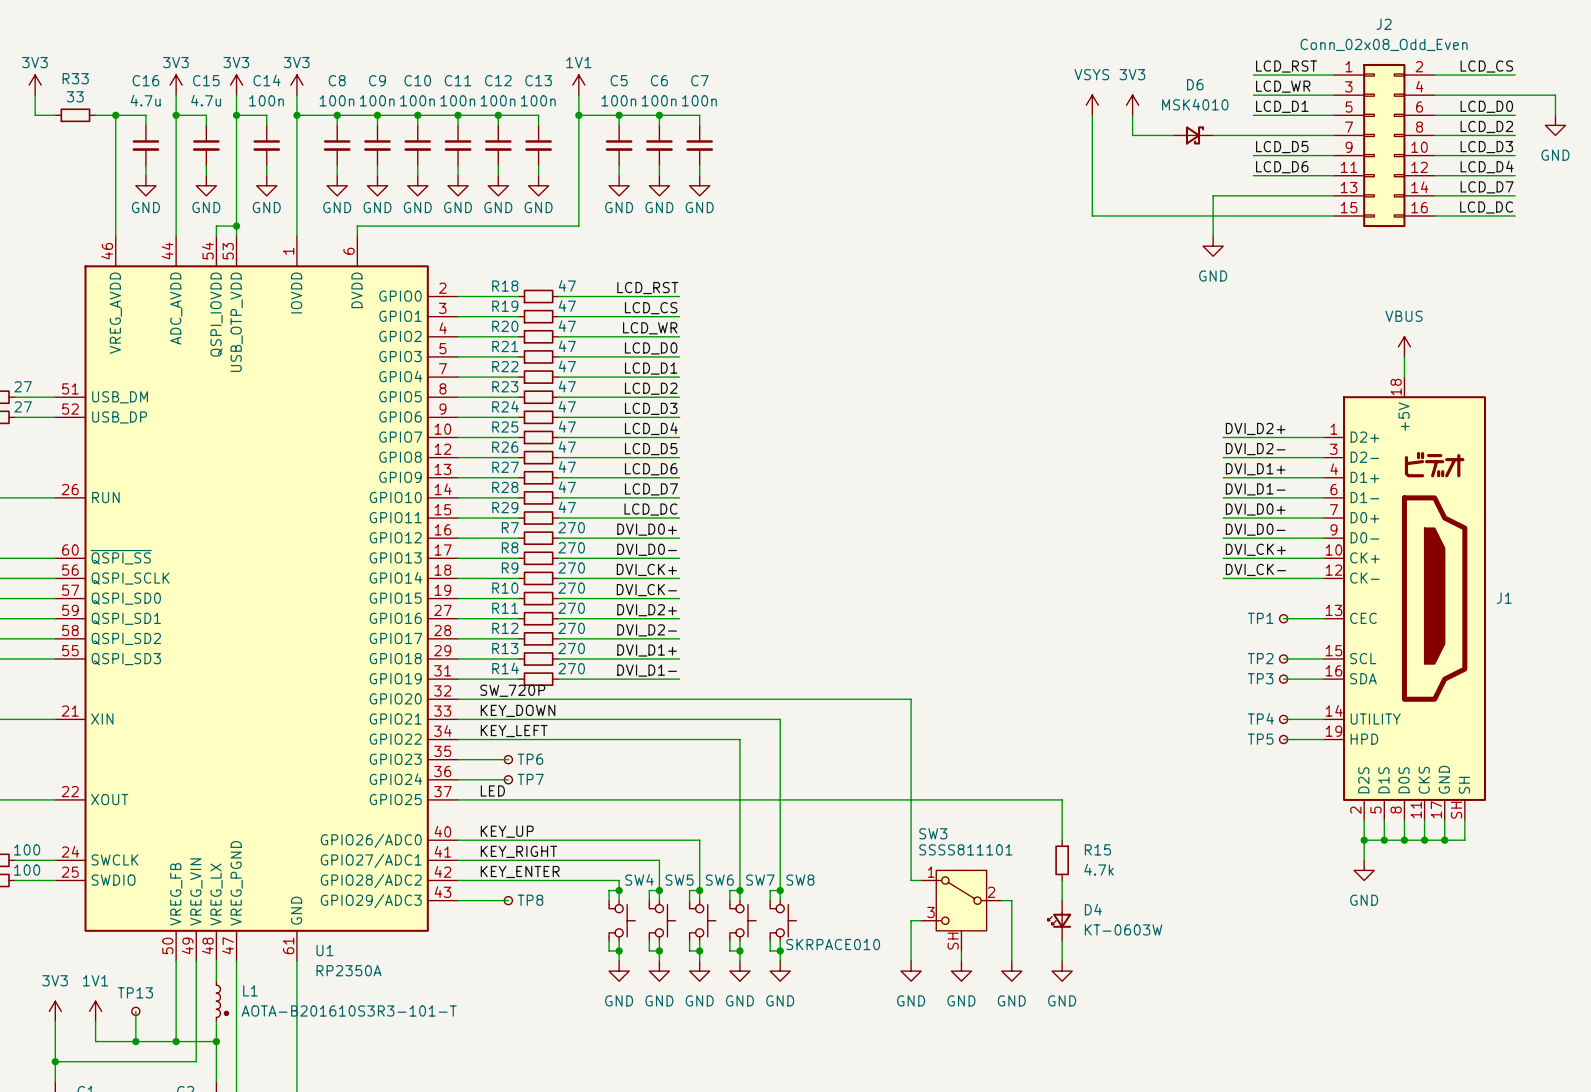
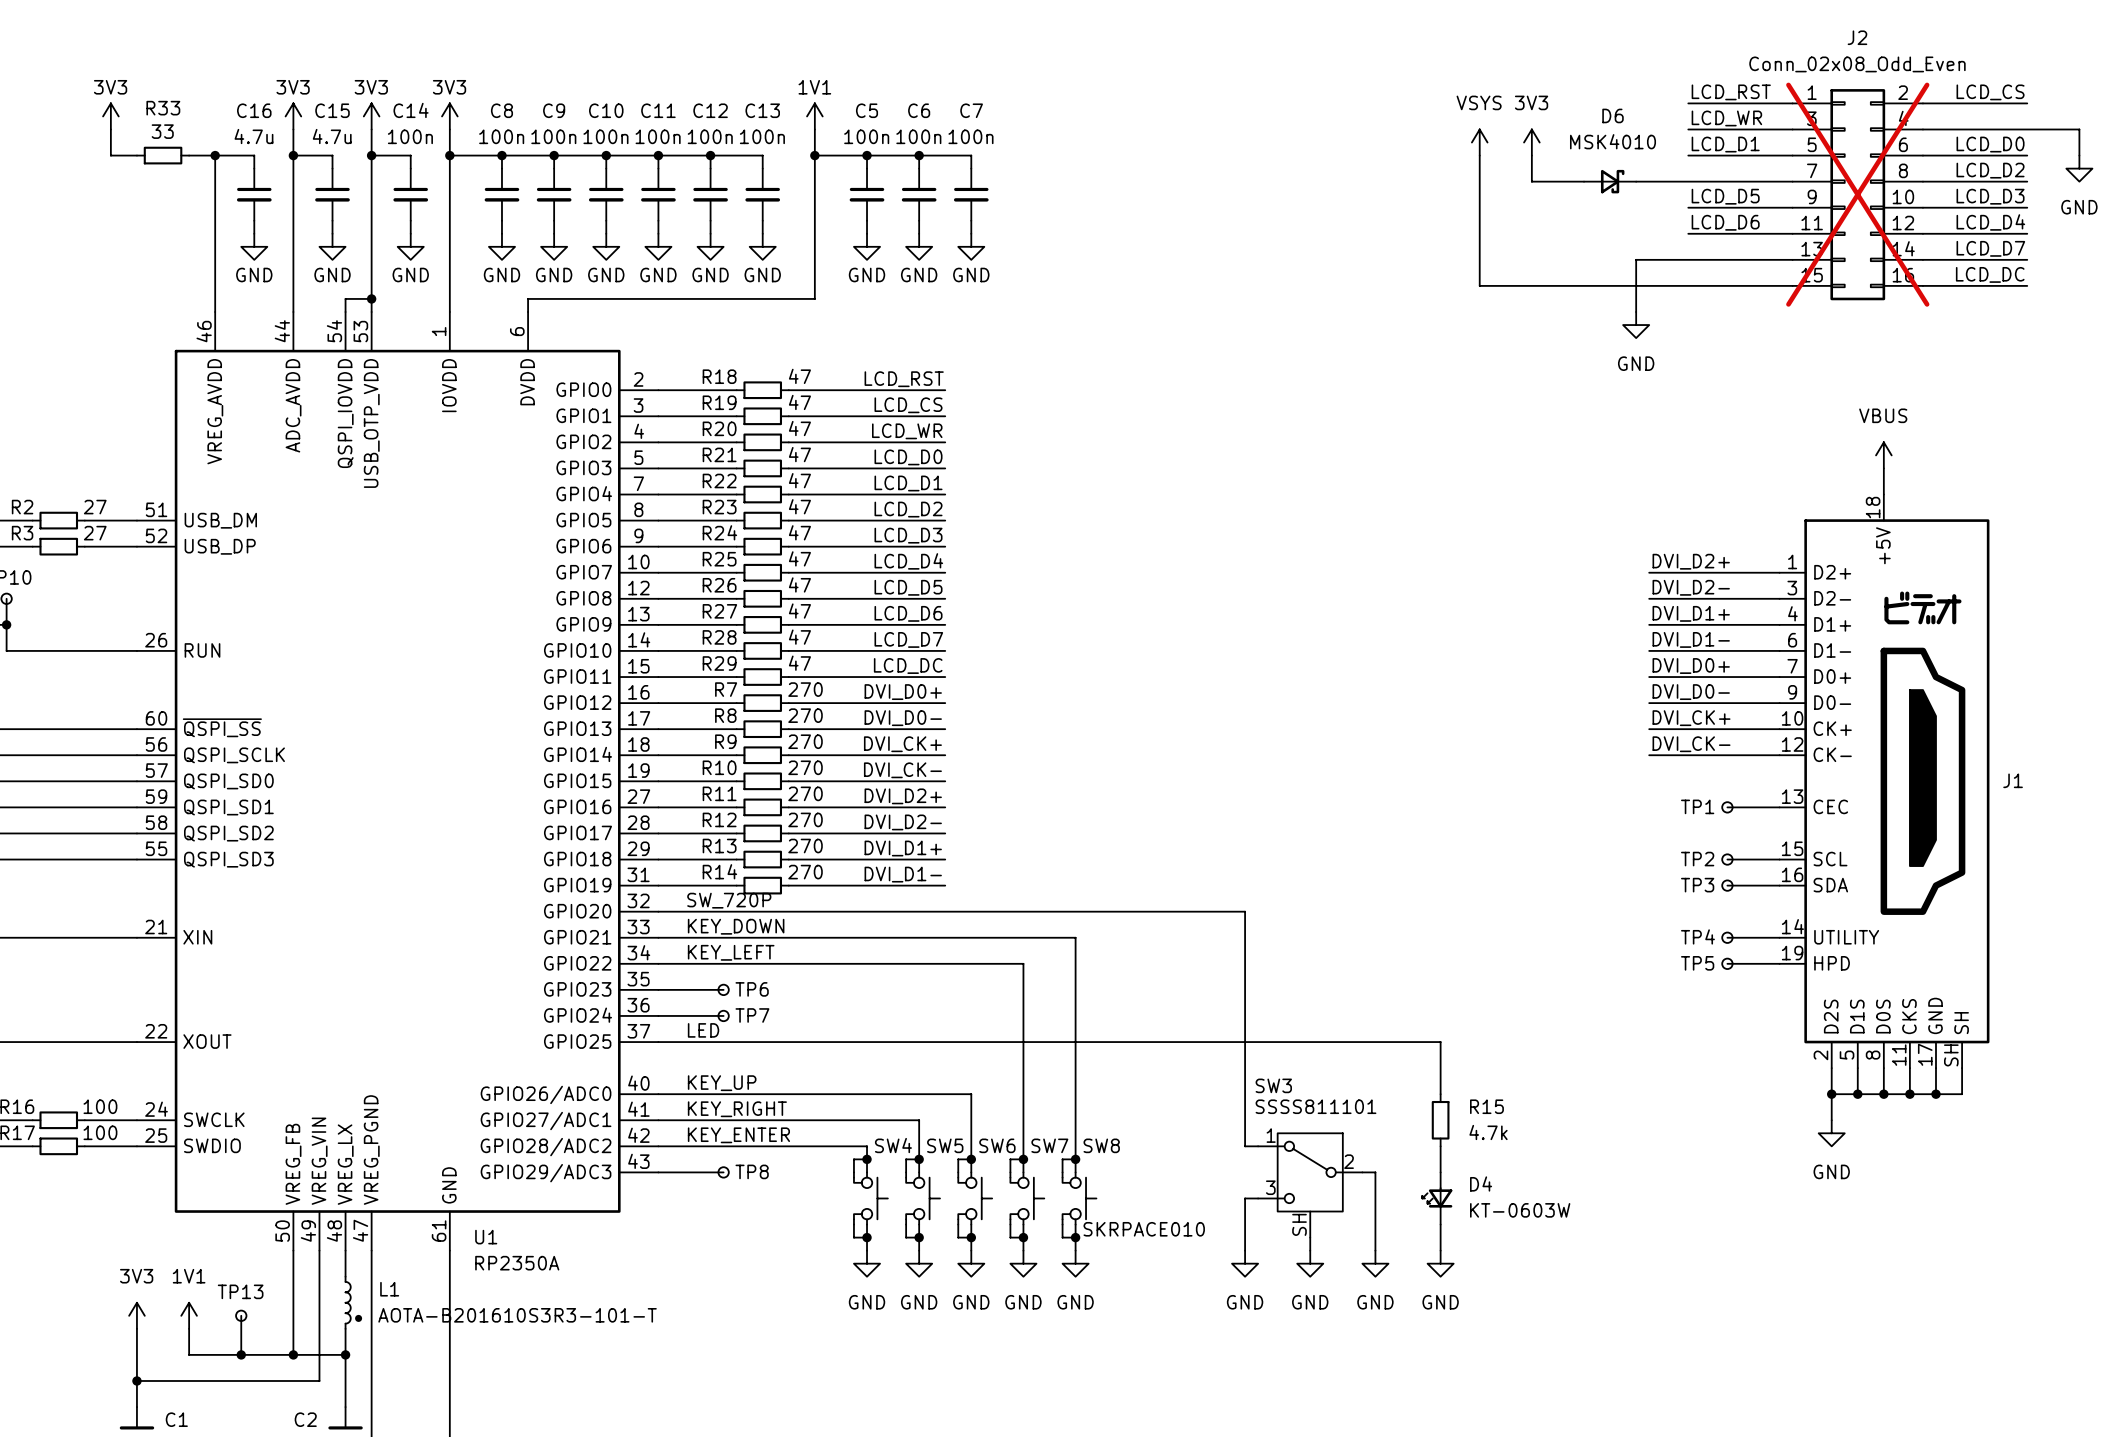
J2 do-not-place cross: none -> (1857, 194)

